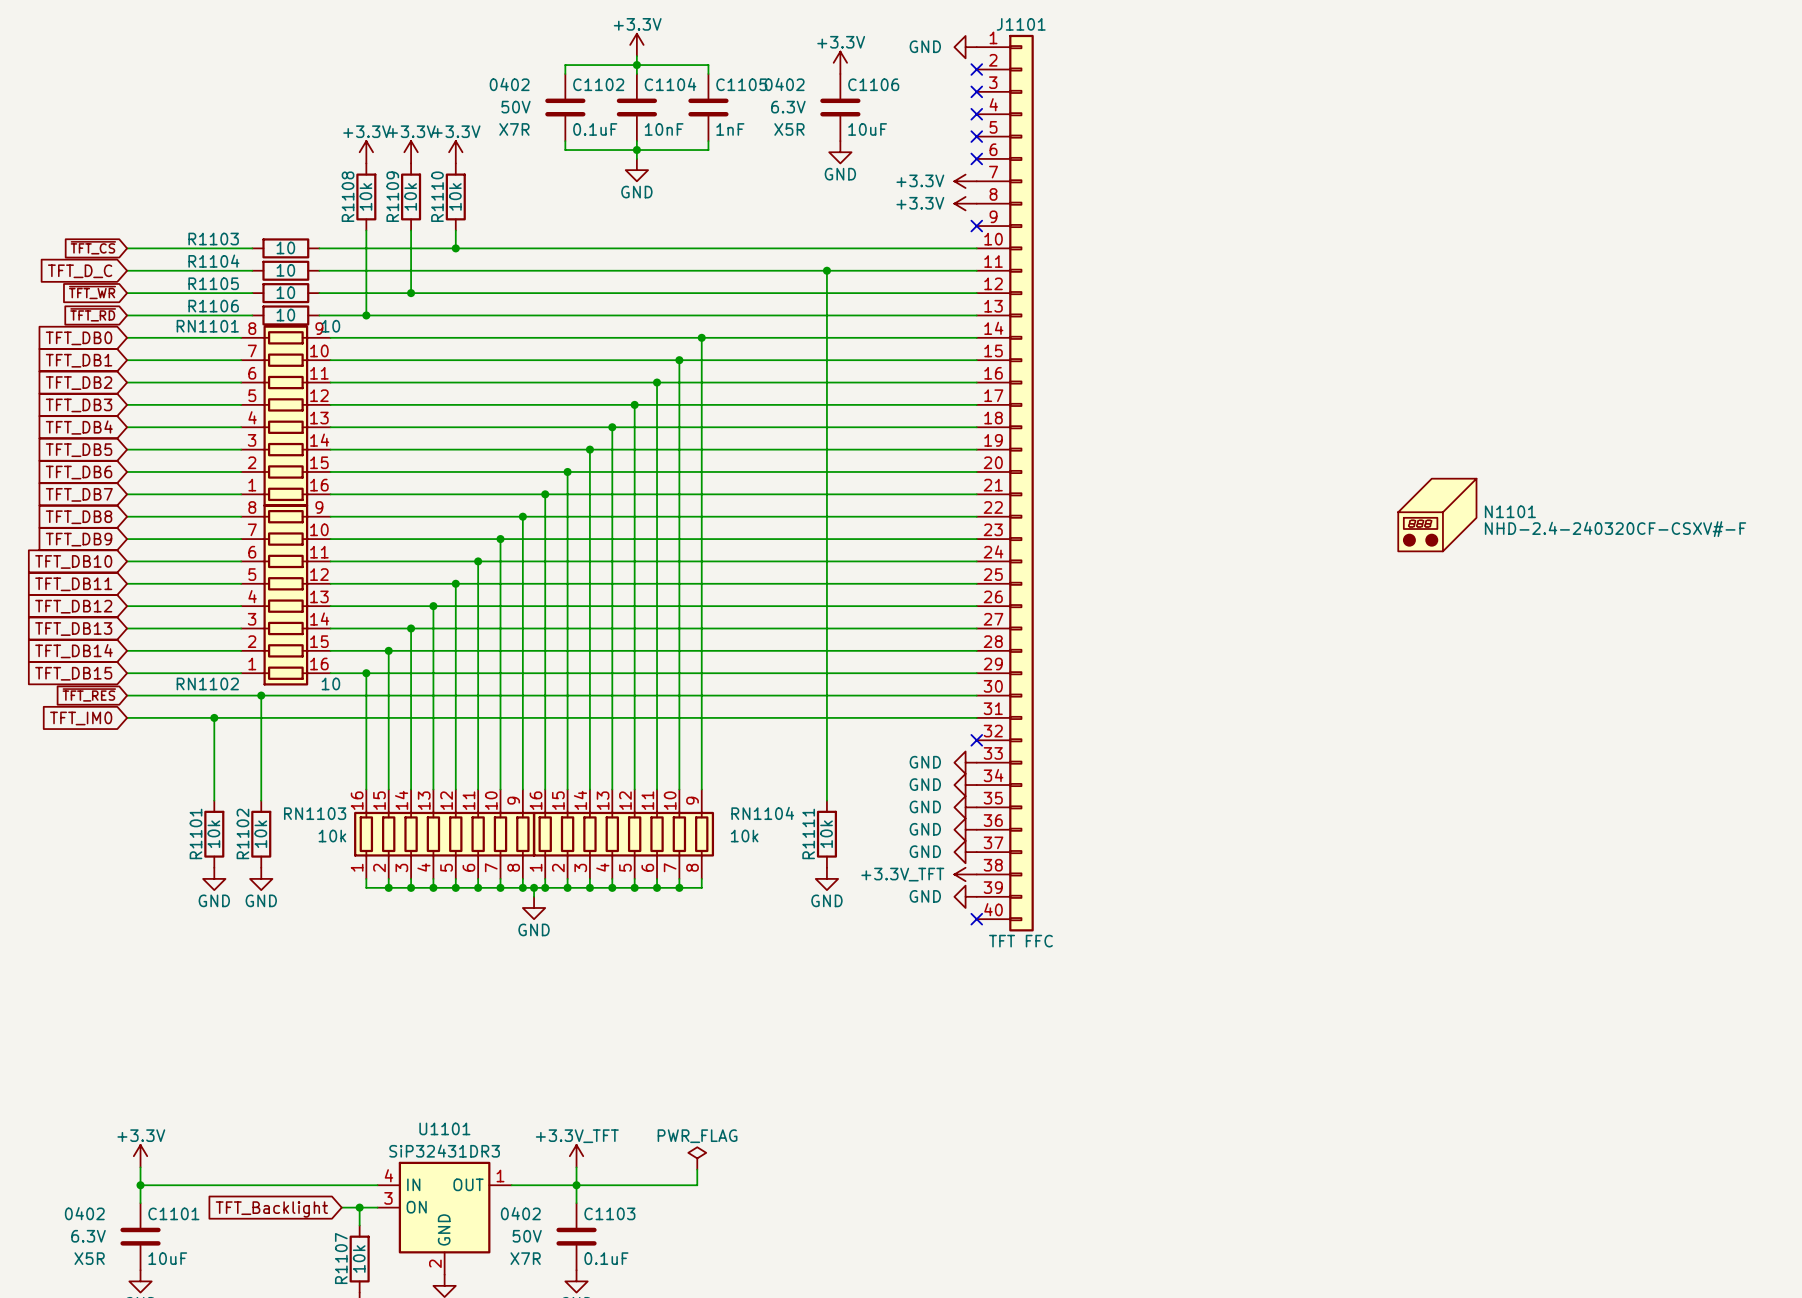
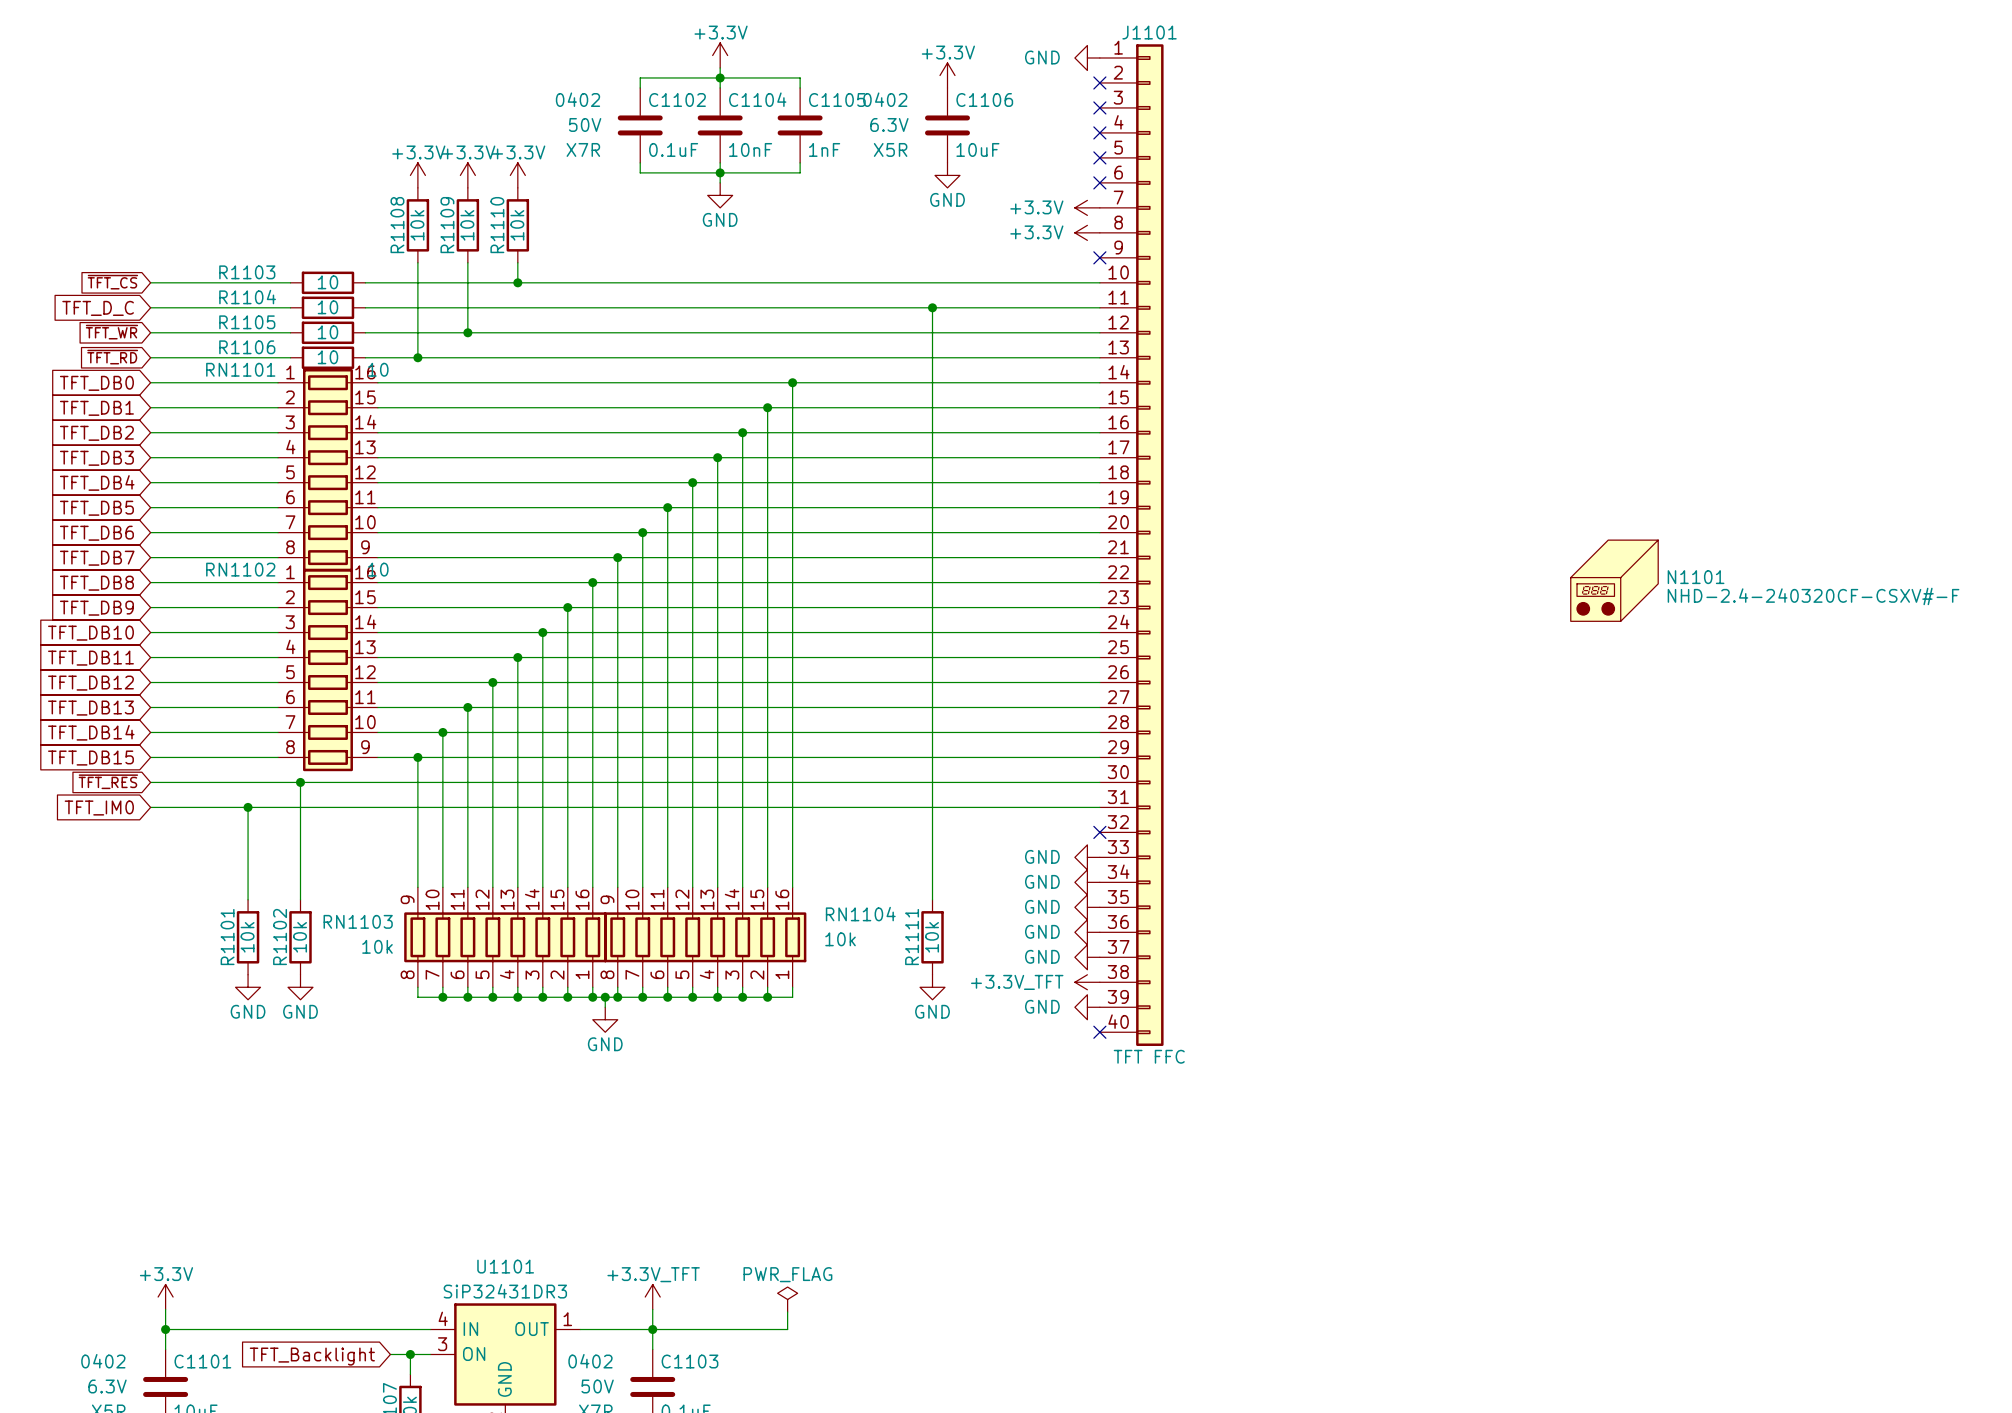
RN1101 flip: as is (285, 416) -> up-down (327, 470)
RN1102 flip: as is (285, 594) -> up-down (327, 670)
RN1103 flip: as is (444, 834) -> left-right (505, 937)
RN1104 flip: as is (623, 834) -> left-right (705, 937)

